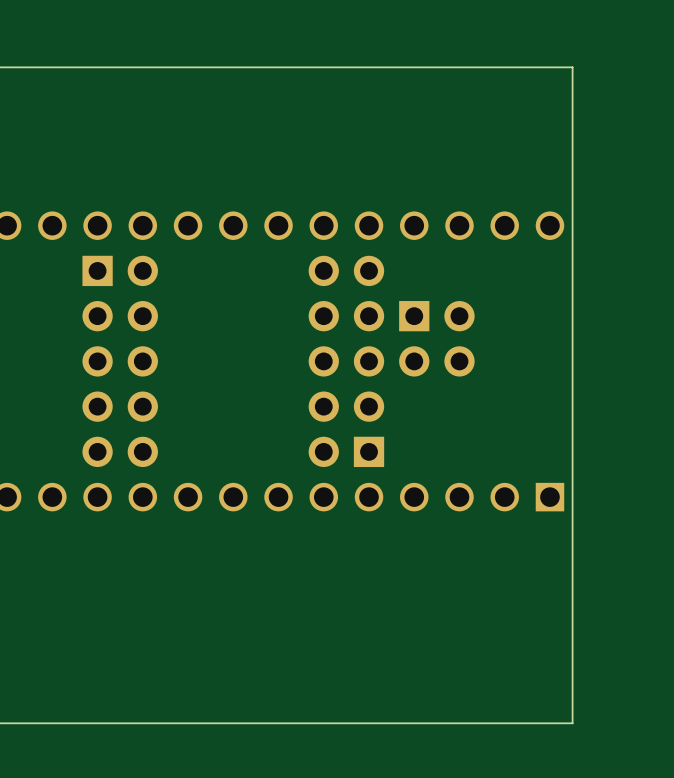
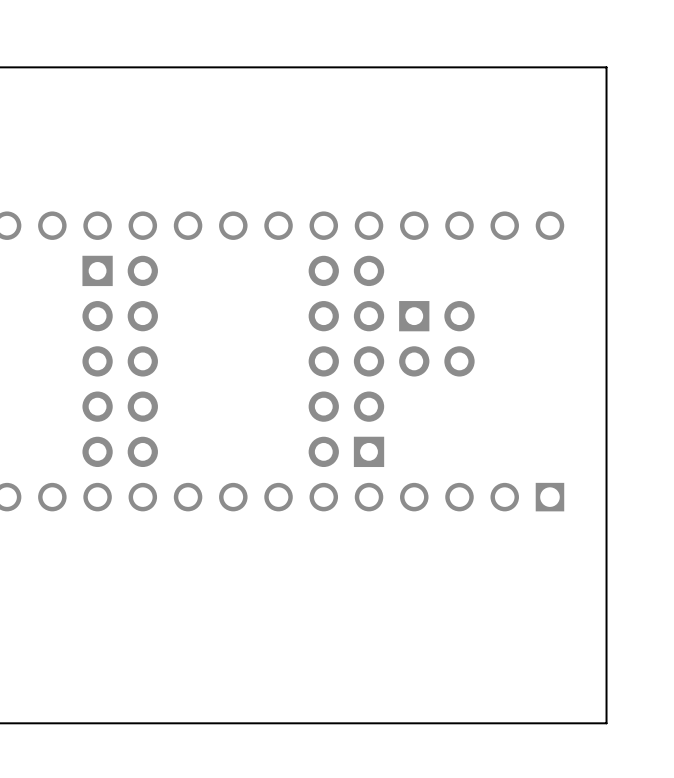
board edge: (572, 67) (572, 723) -> (572, 67) (606, 67) (606, 723) (572, 723)

